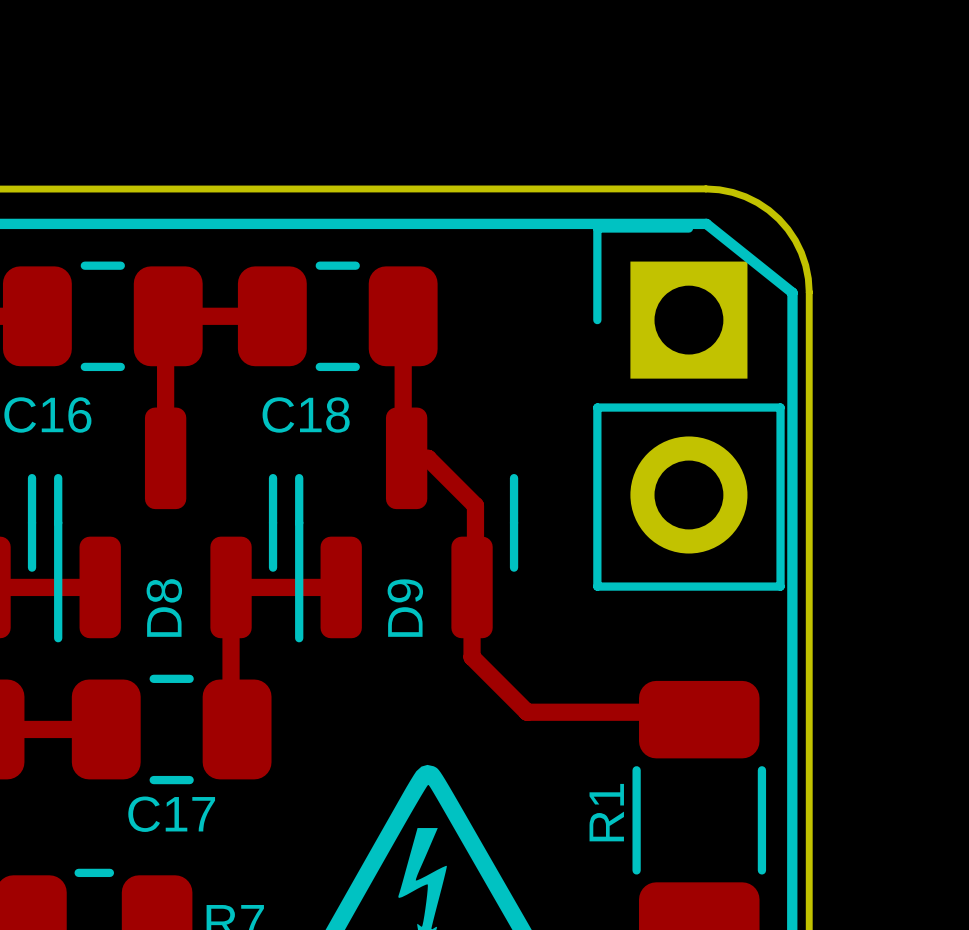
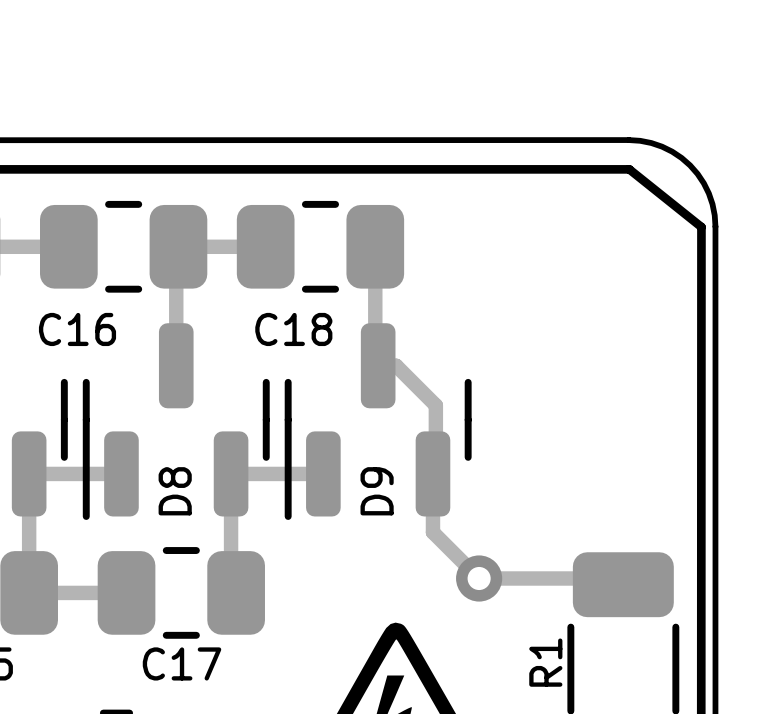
part: (688, 407) -> none
via: none -> (479, 578)

